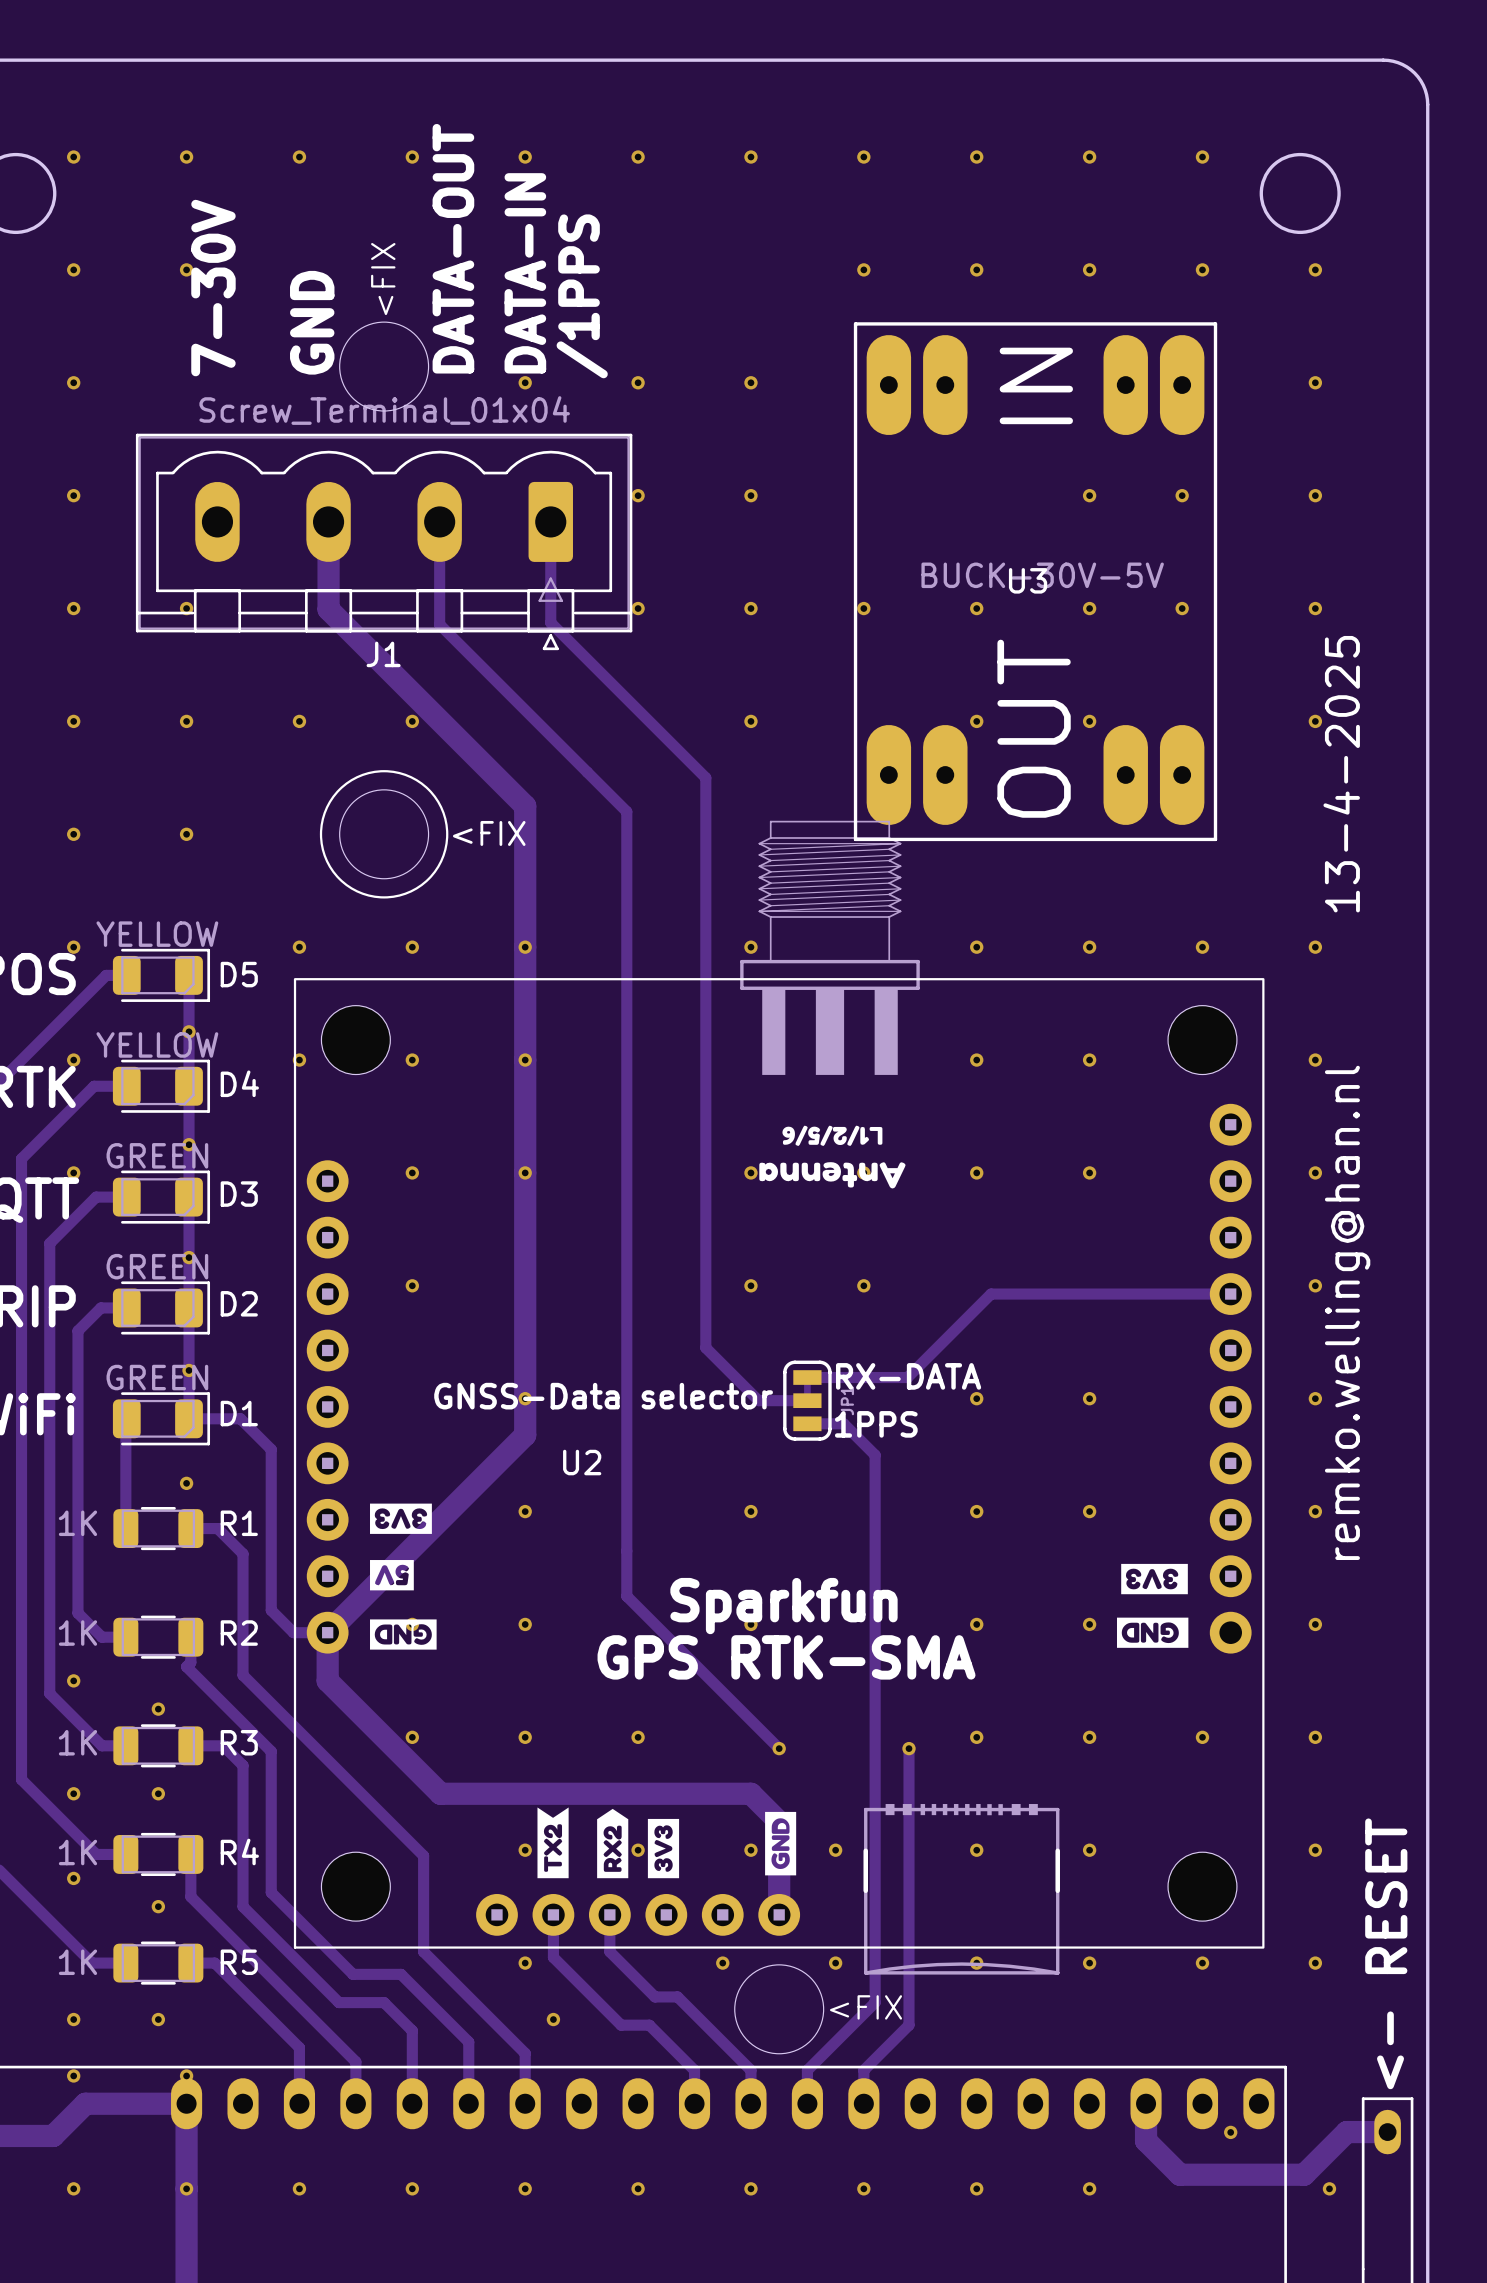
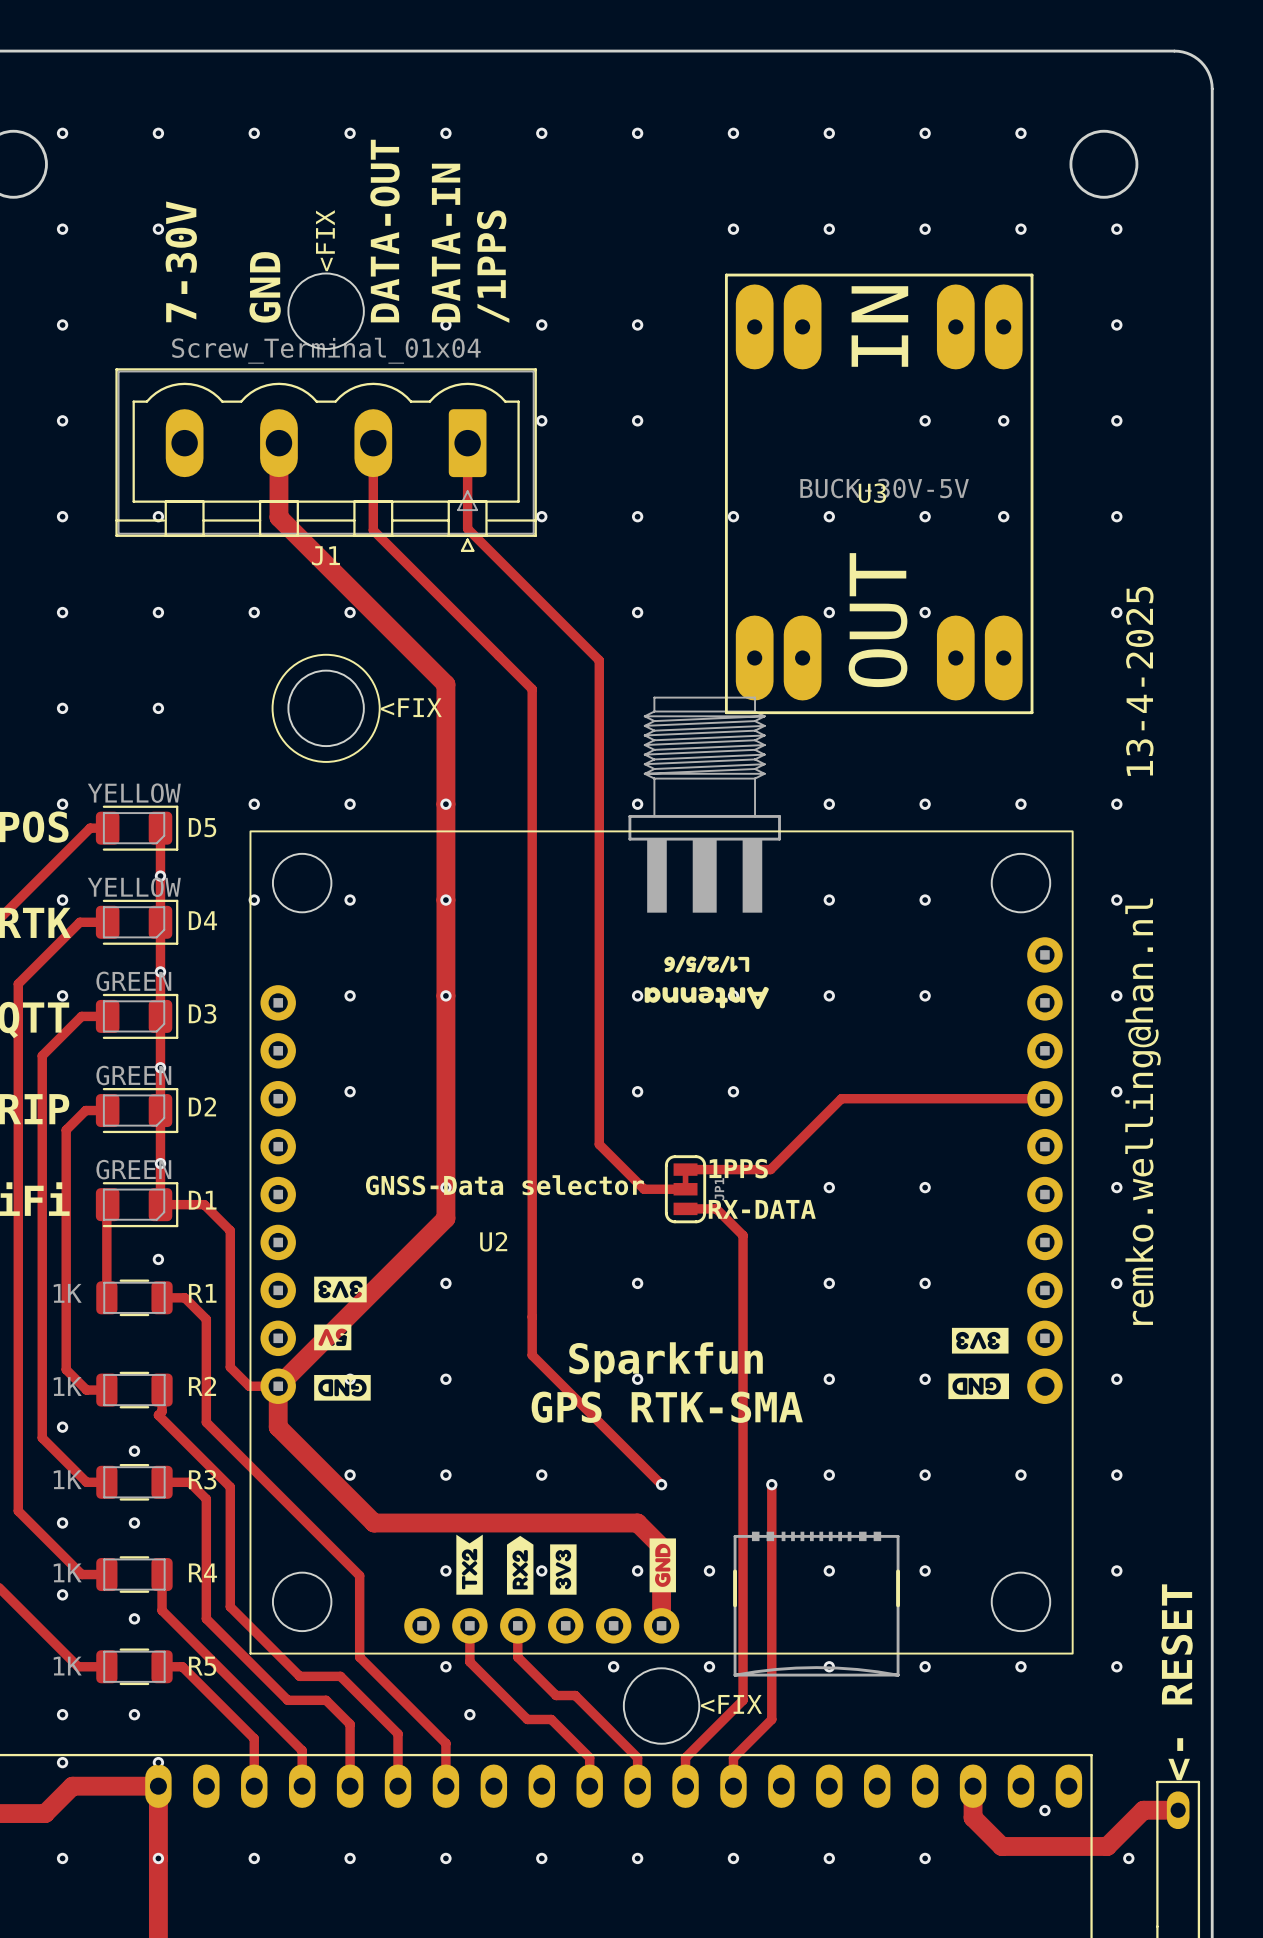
text position: RX-DATA (908, 1376) -> RX-DATA (762, 1209)
text position: 1PPS (876, 1424) -> 1PPS (738, 1168)

